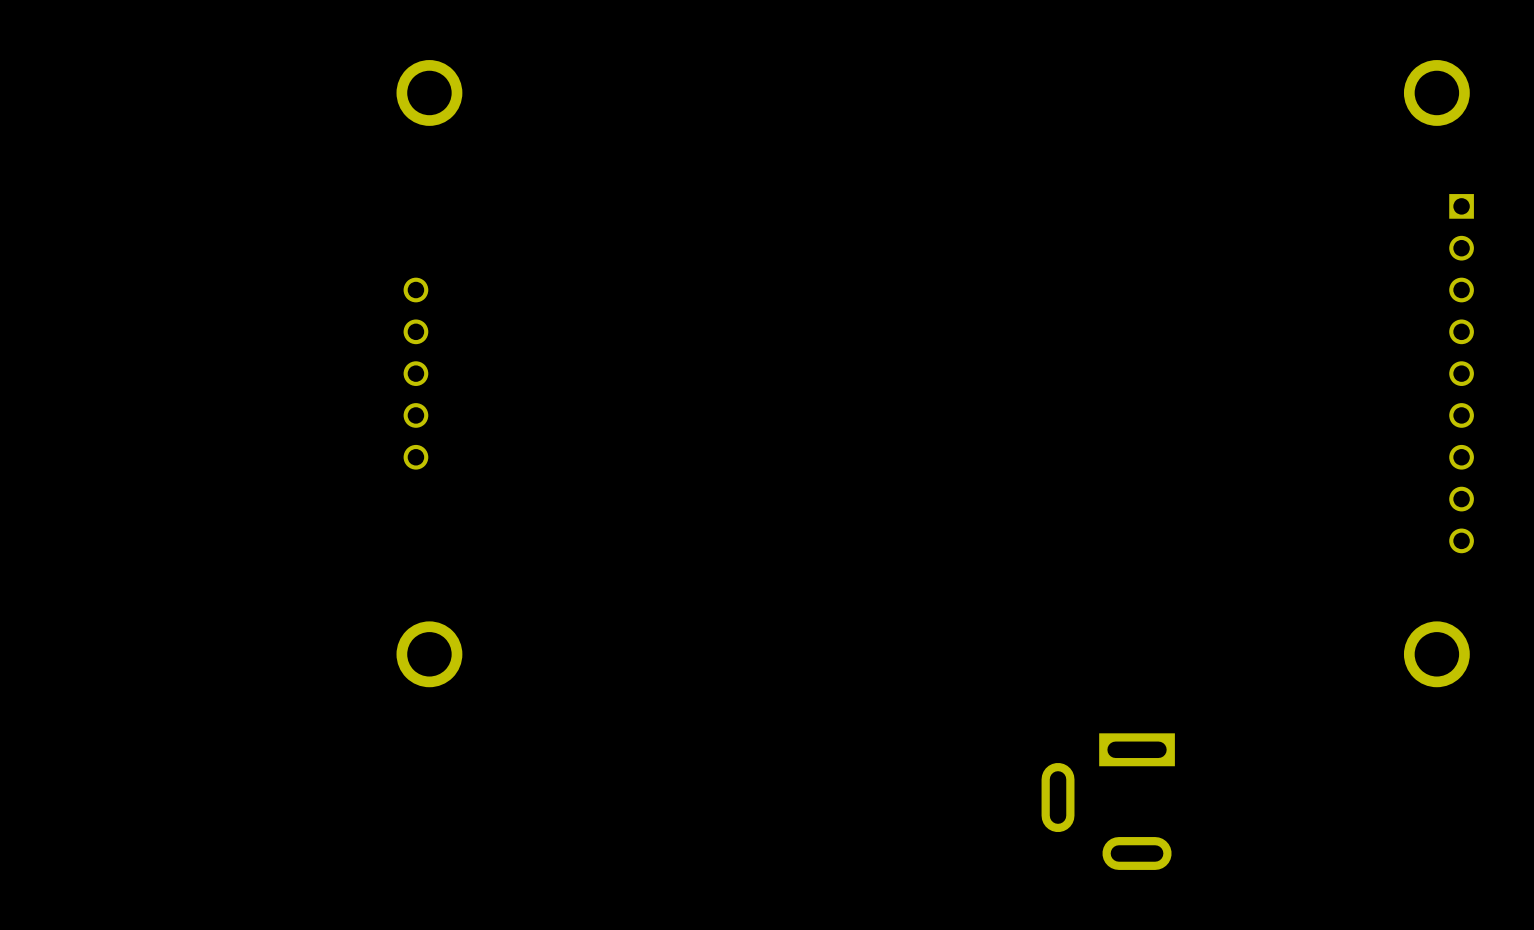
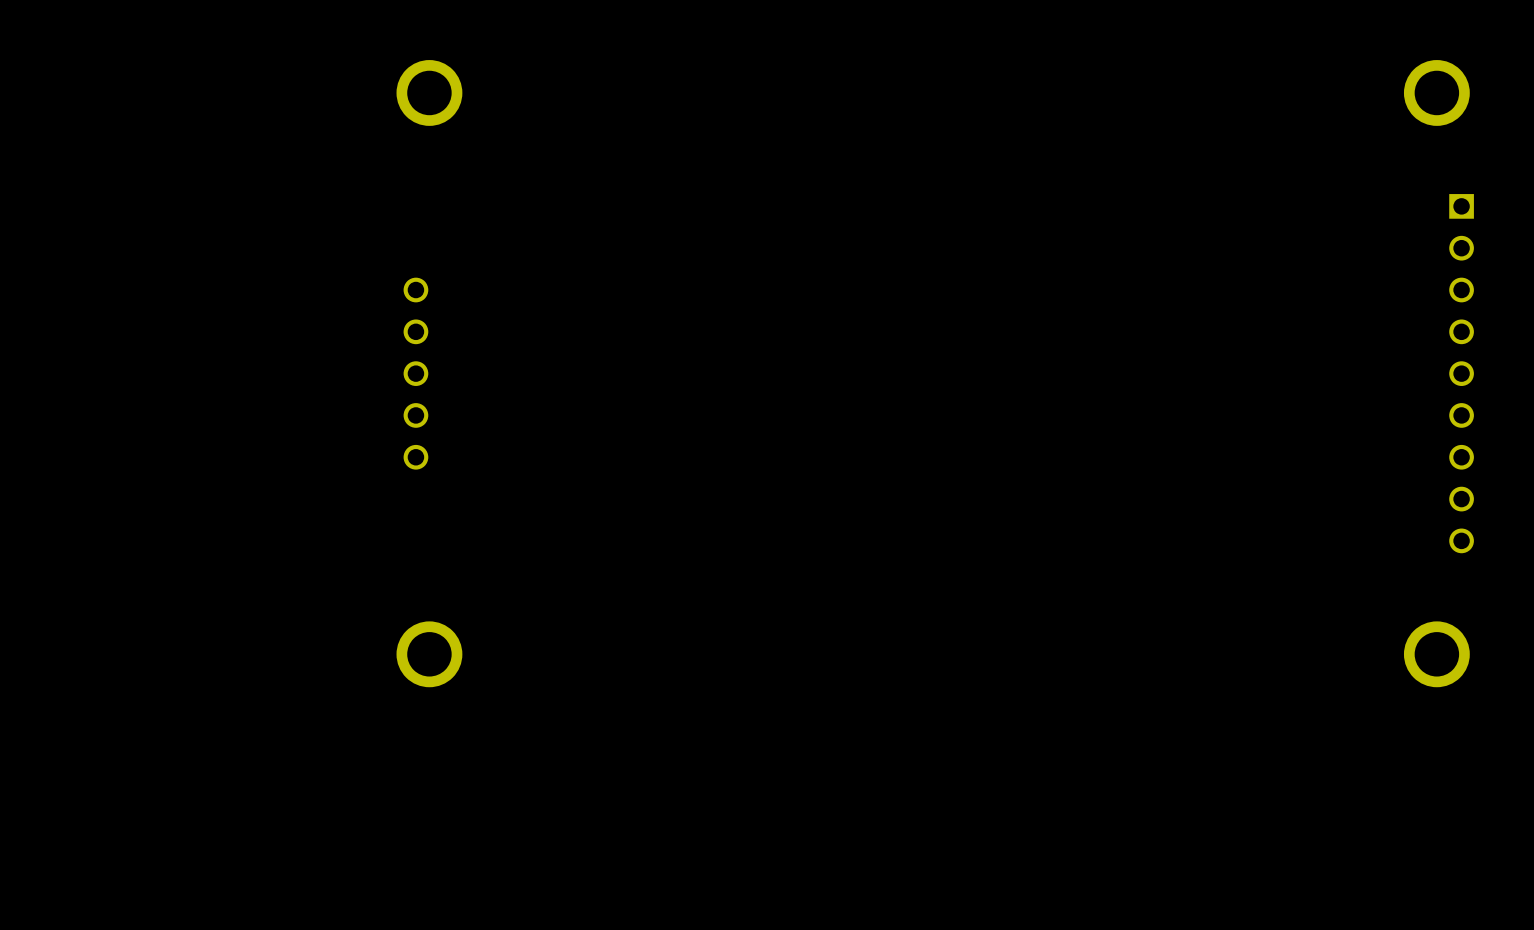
part: (1108, 801) -> none

